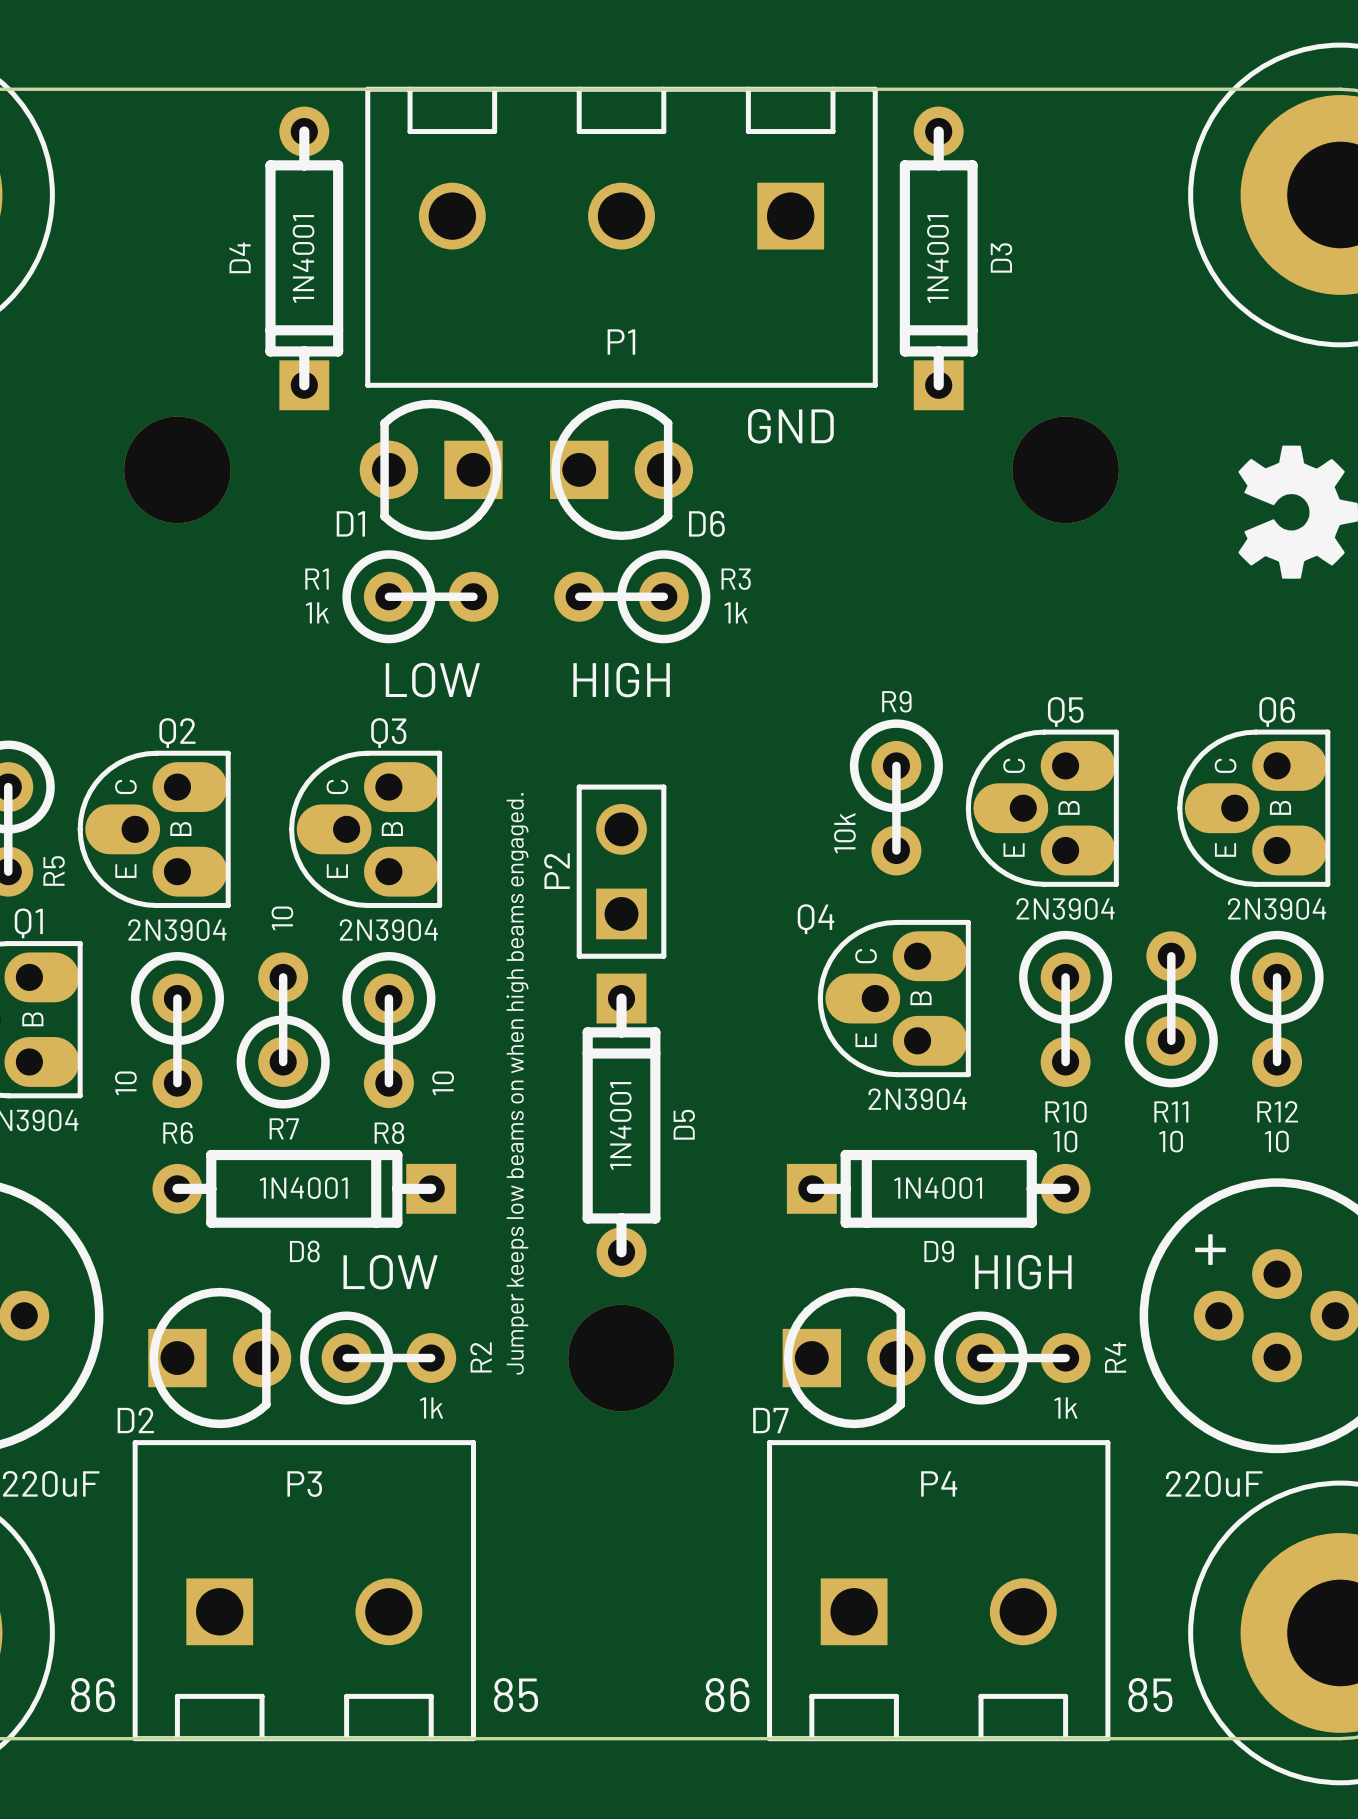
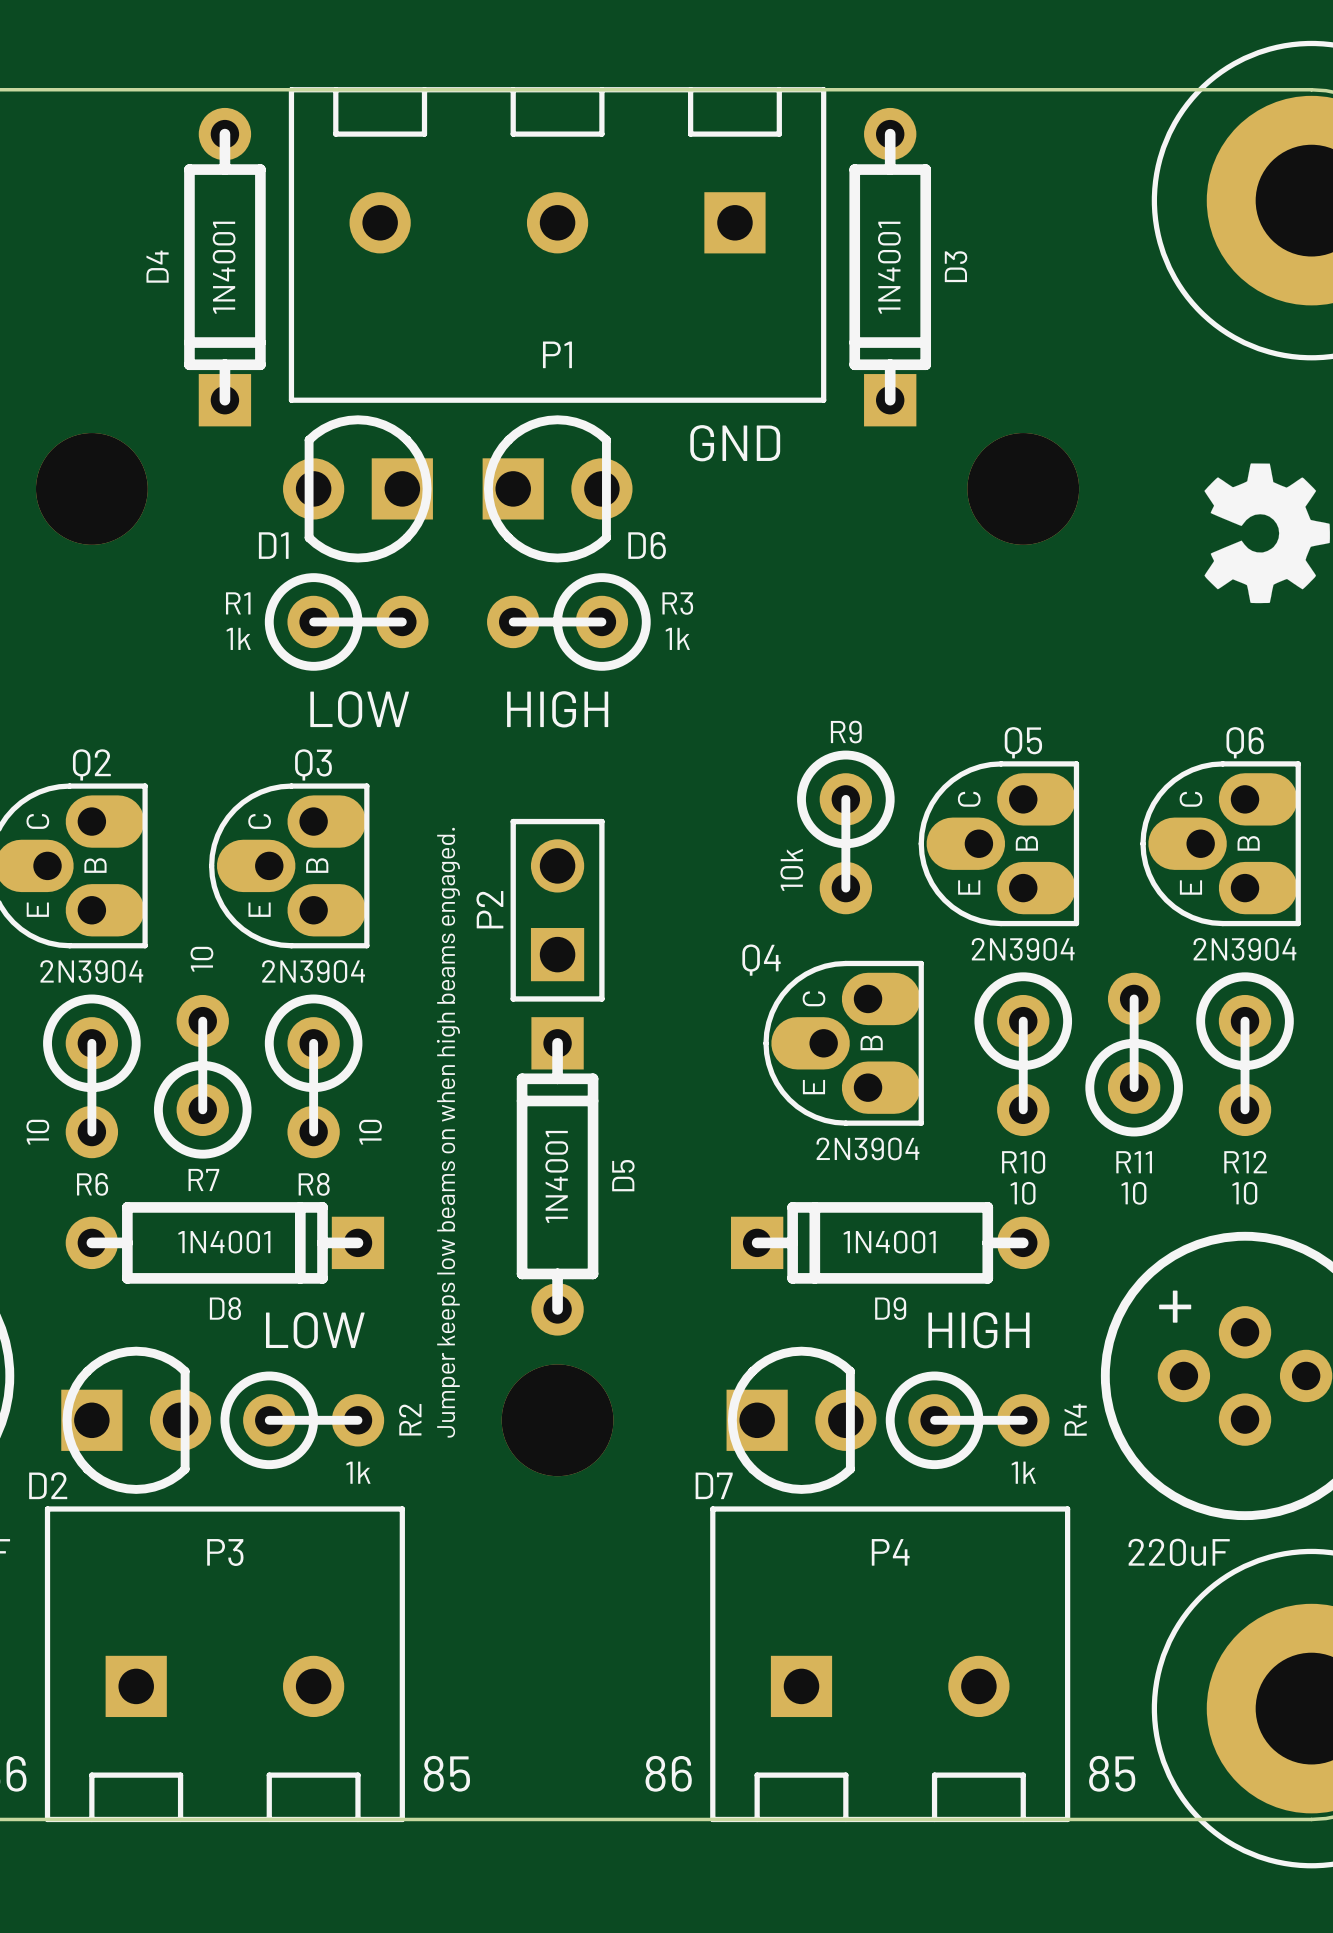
P1 footprint: [365, 86, 878, 388] -> [288, 87, 827, 403]
P3 footprint: [132, 1440, 476, 1742] -> [44, 1506, 405, 1823]
P4 footprint: [767, 1440, 1111, 1742] -> [710, 1506, 1071, 1823]

